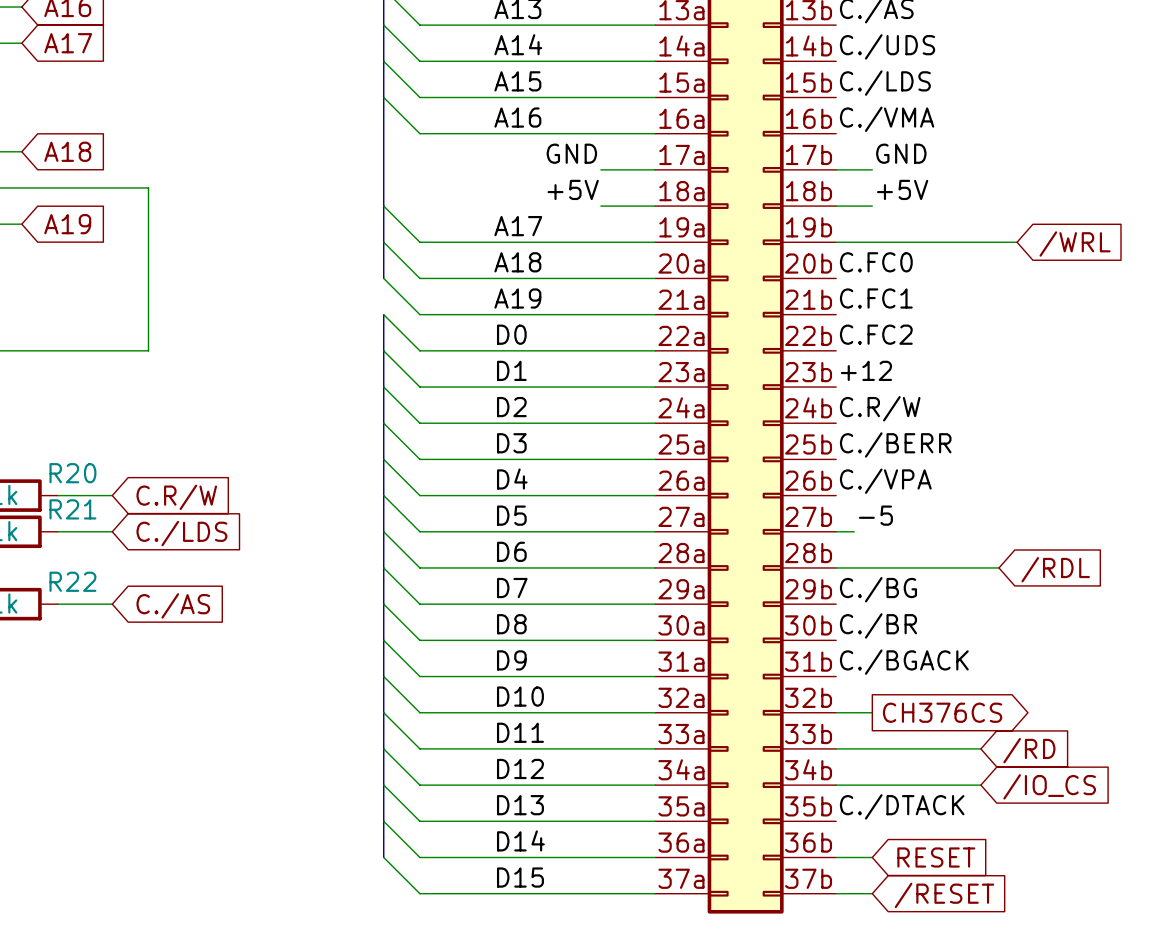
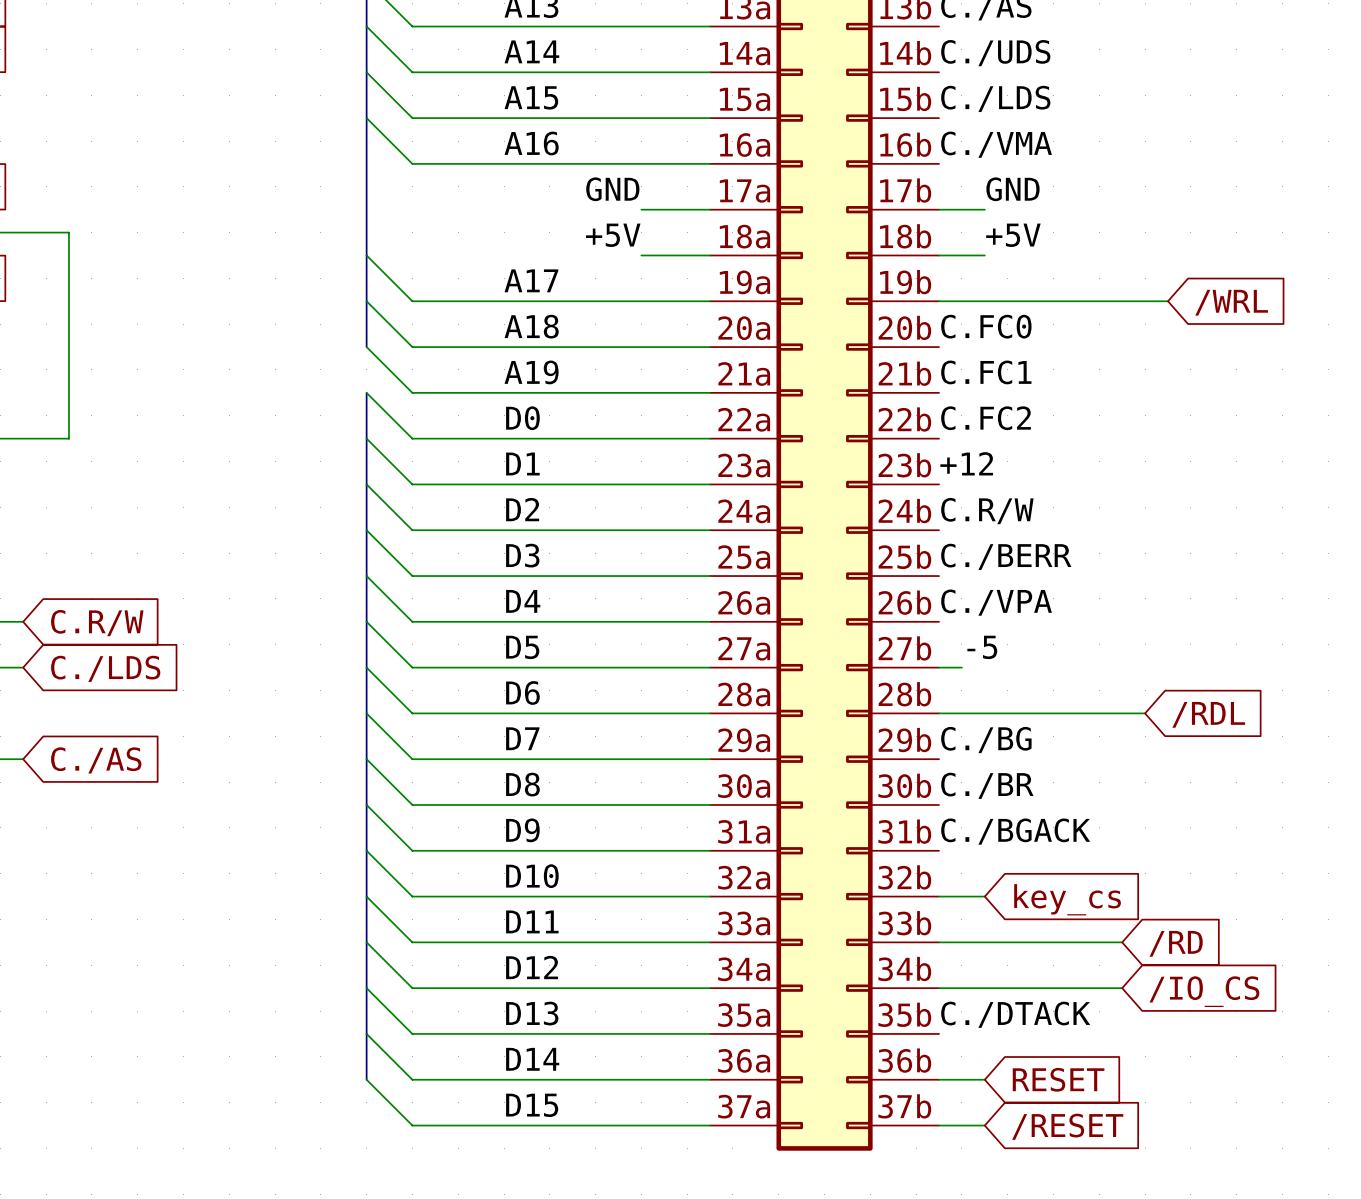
global label shape: output (942, 712) -> input (1067, 899)
global label: CH376CS (942, 712) -> key_cs (1067, 899)

